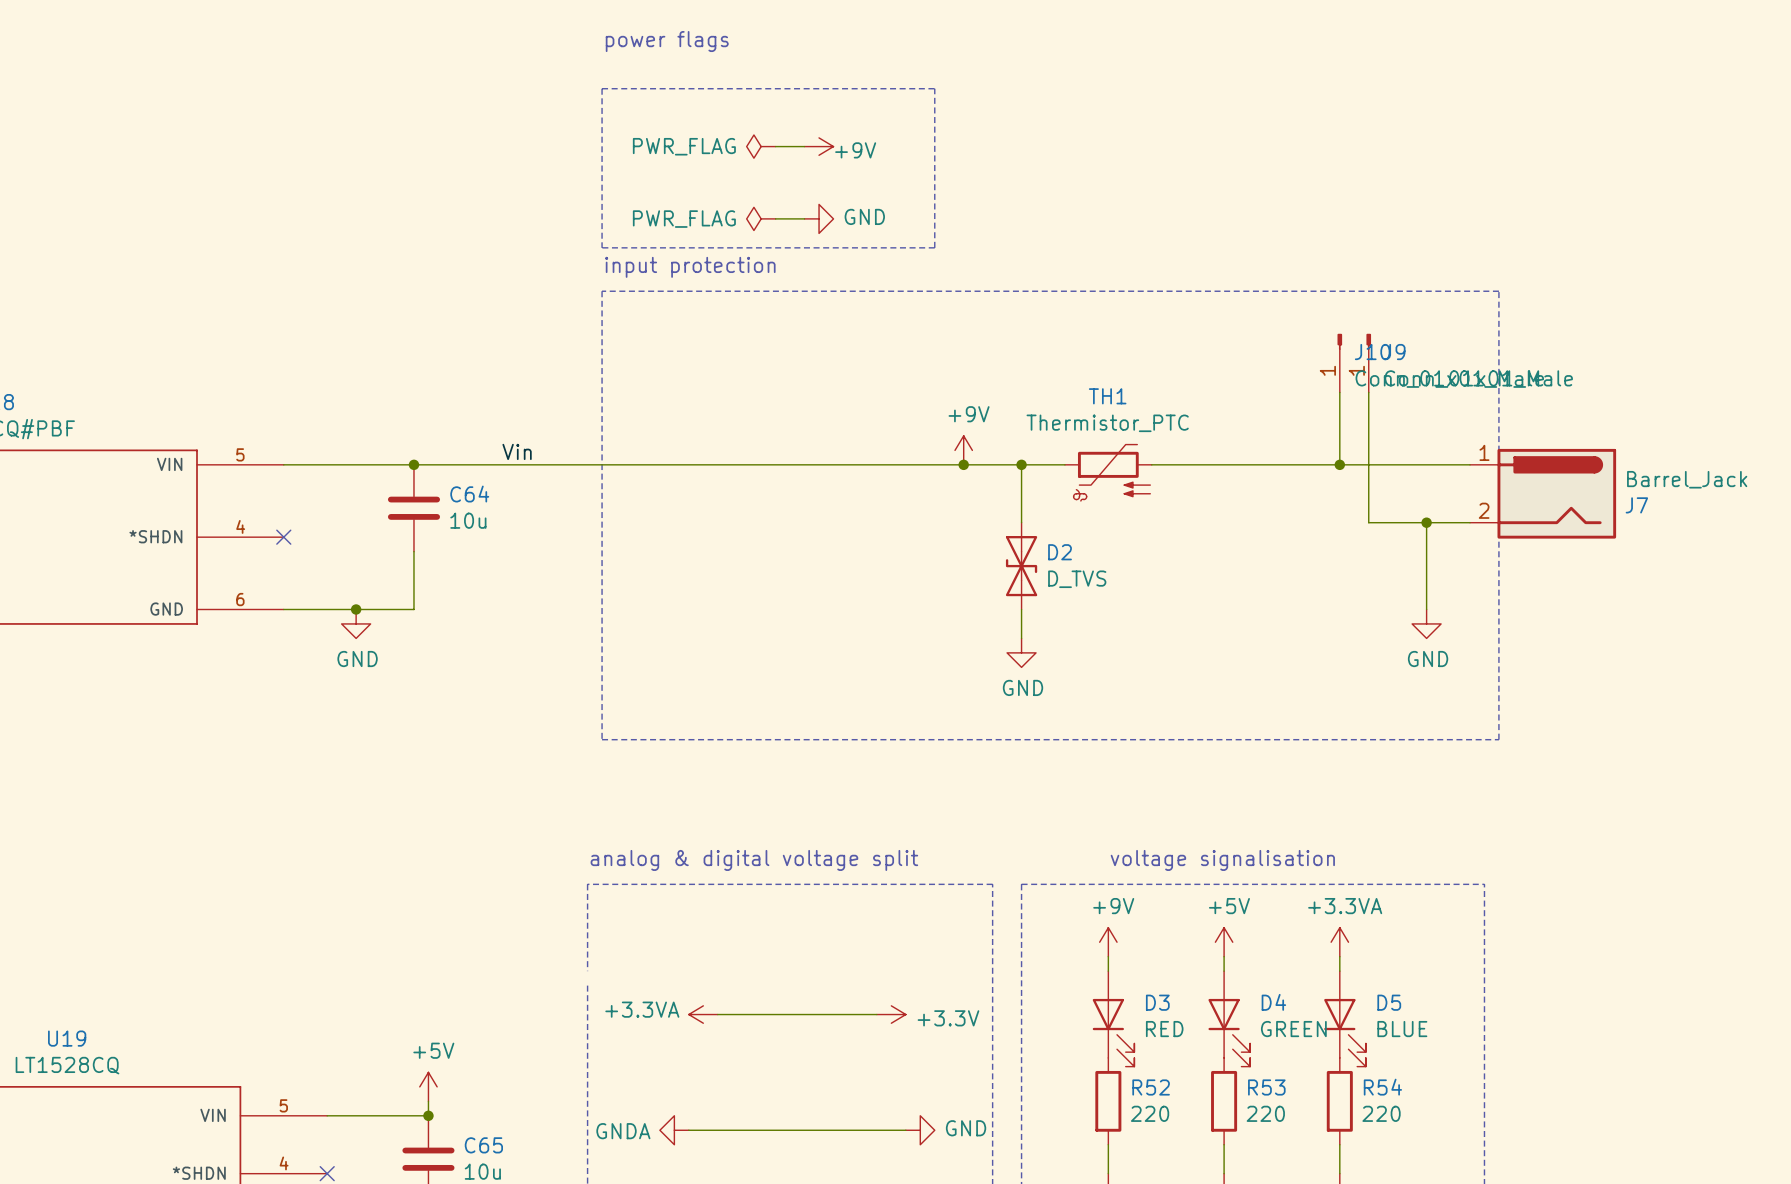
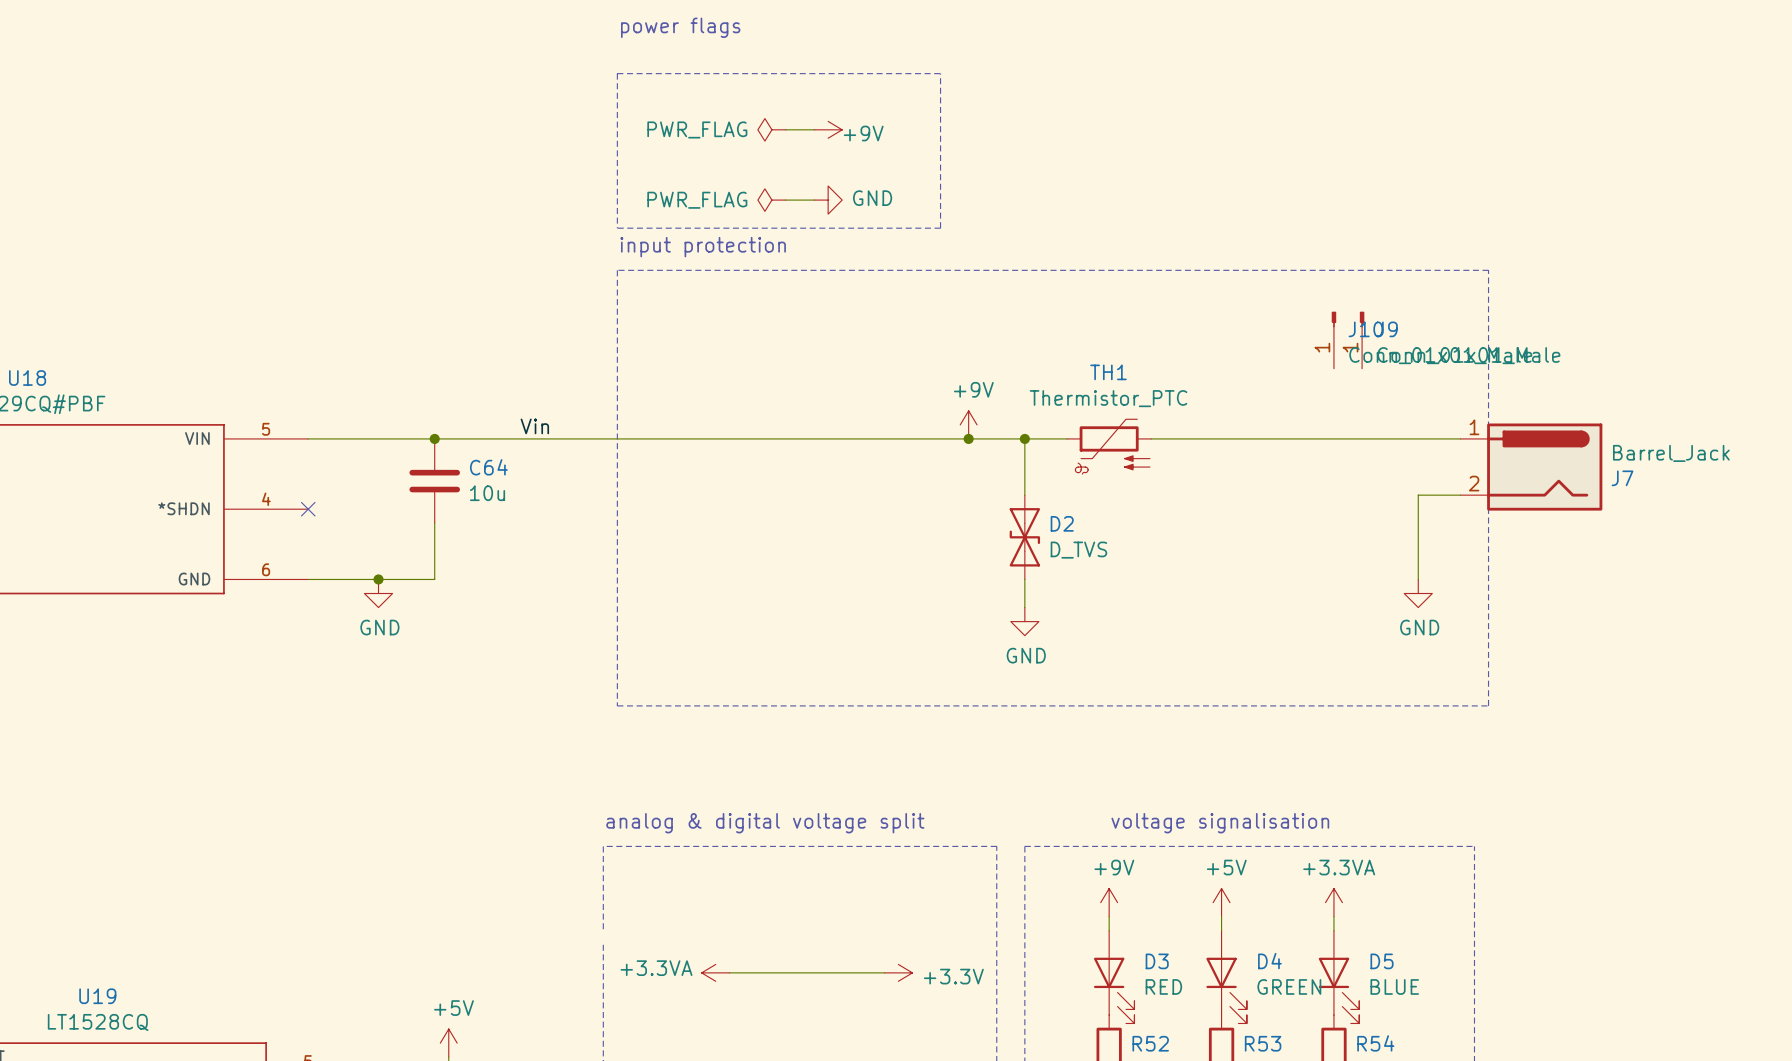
wire: (1339, 392) (1339, 464) -> none
wire: (1368, 392) (1368, 522) (1426, 522) -> none
junction: (1339, 464) -> none
junction: (1426, 522) -> none

